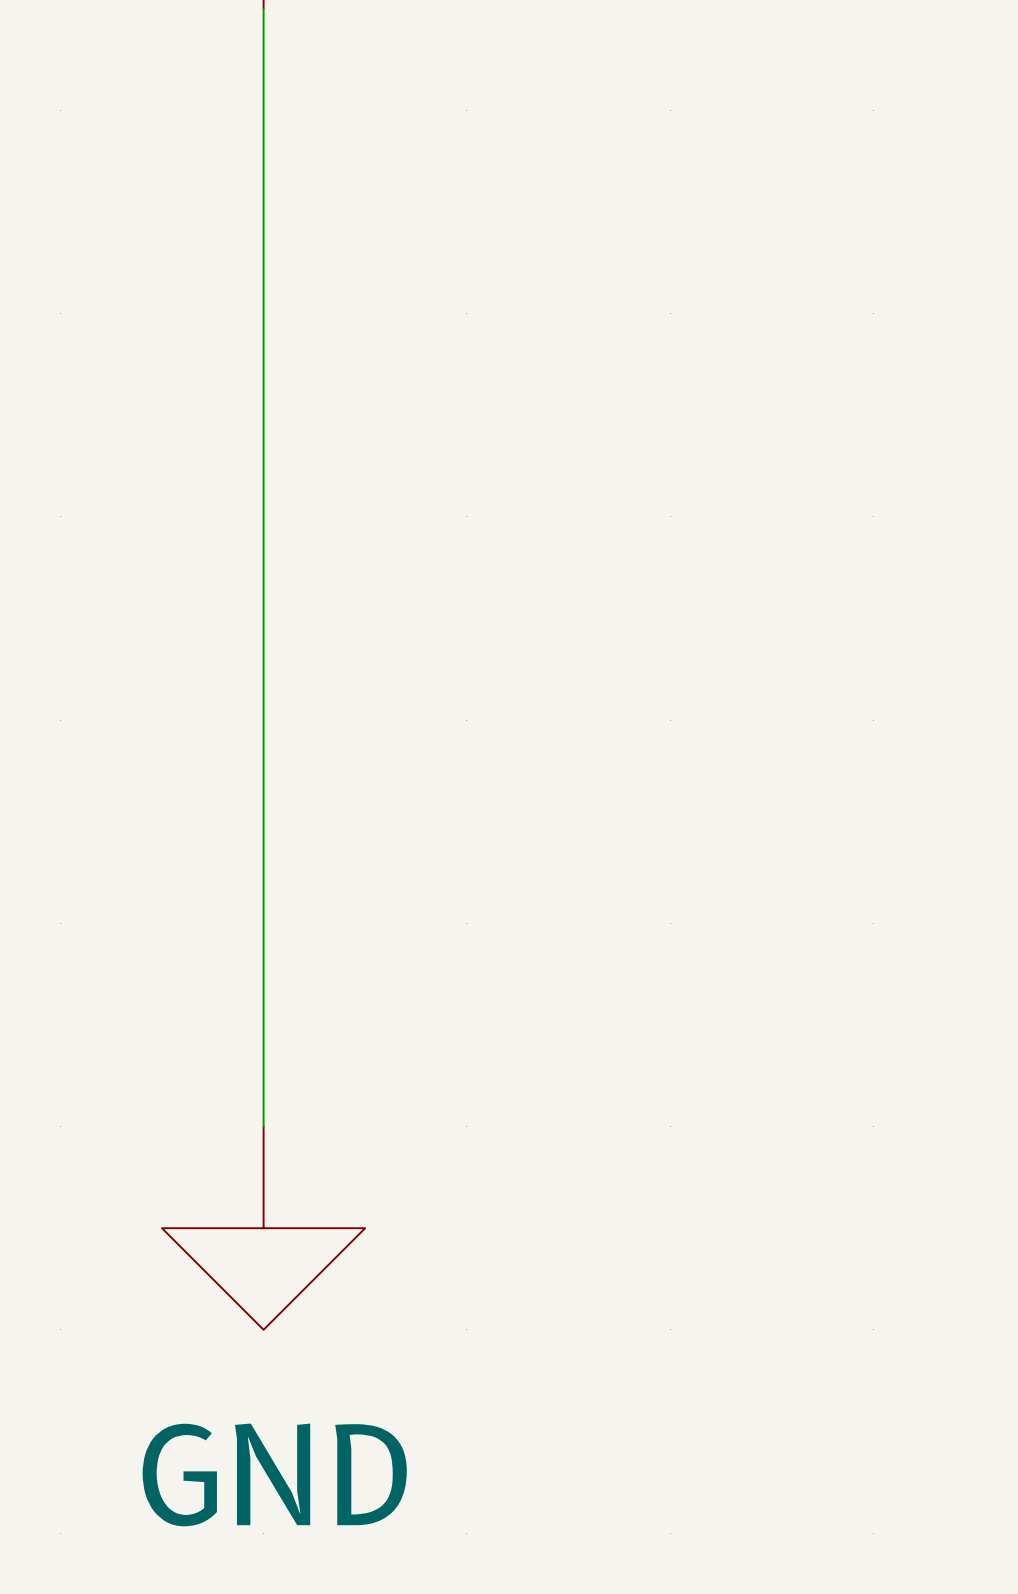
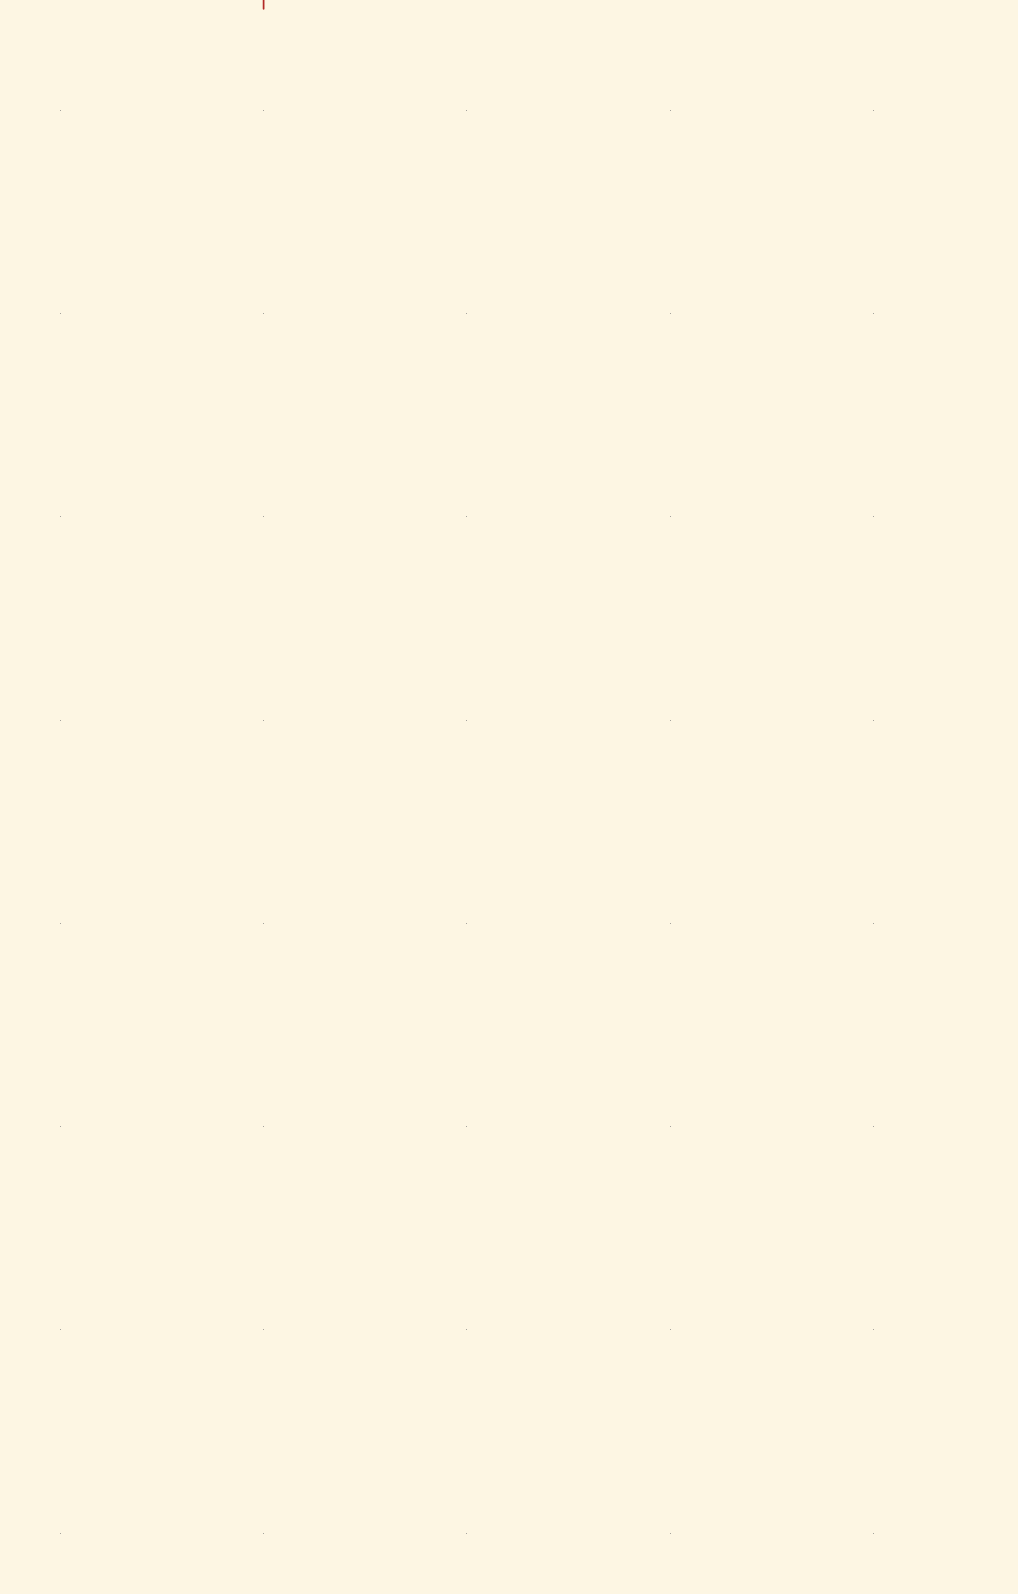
wire: (263, 8) (263, 1126) -> none
power symbol: GND (263, 1228) -> none

